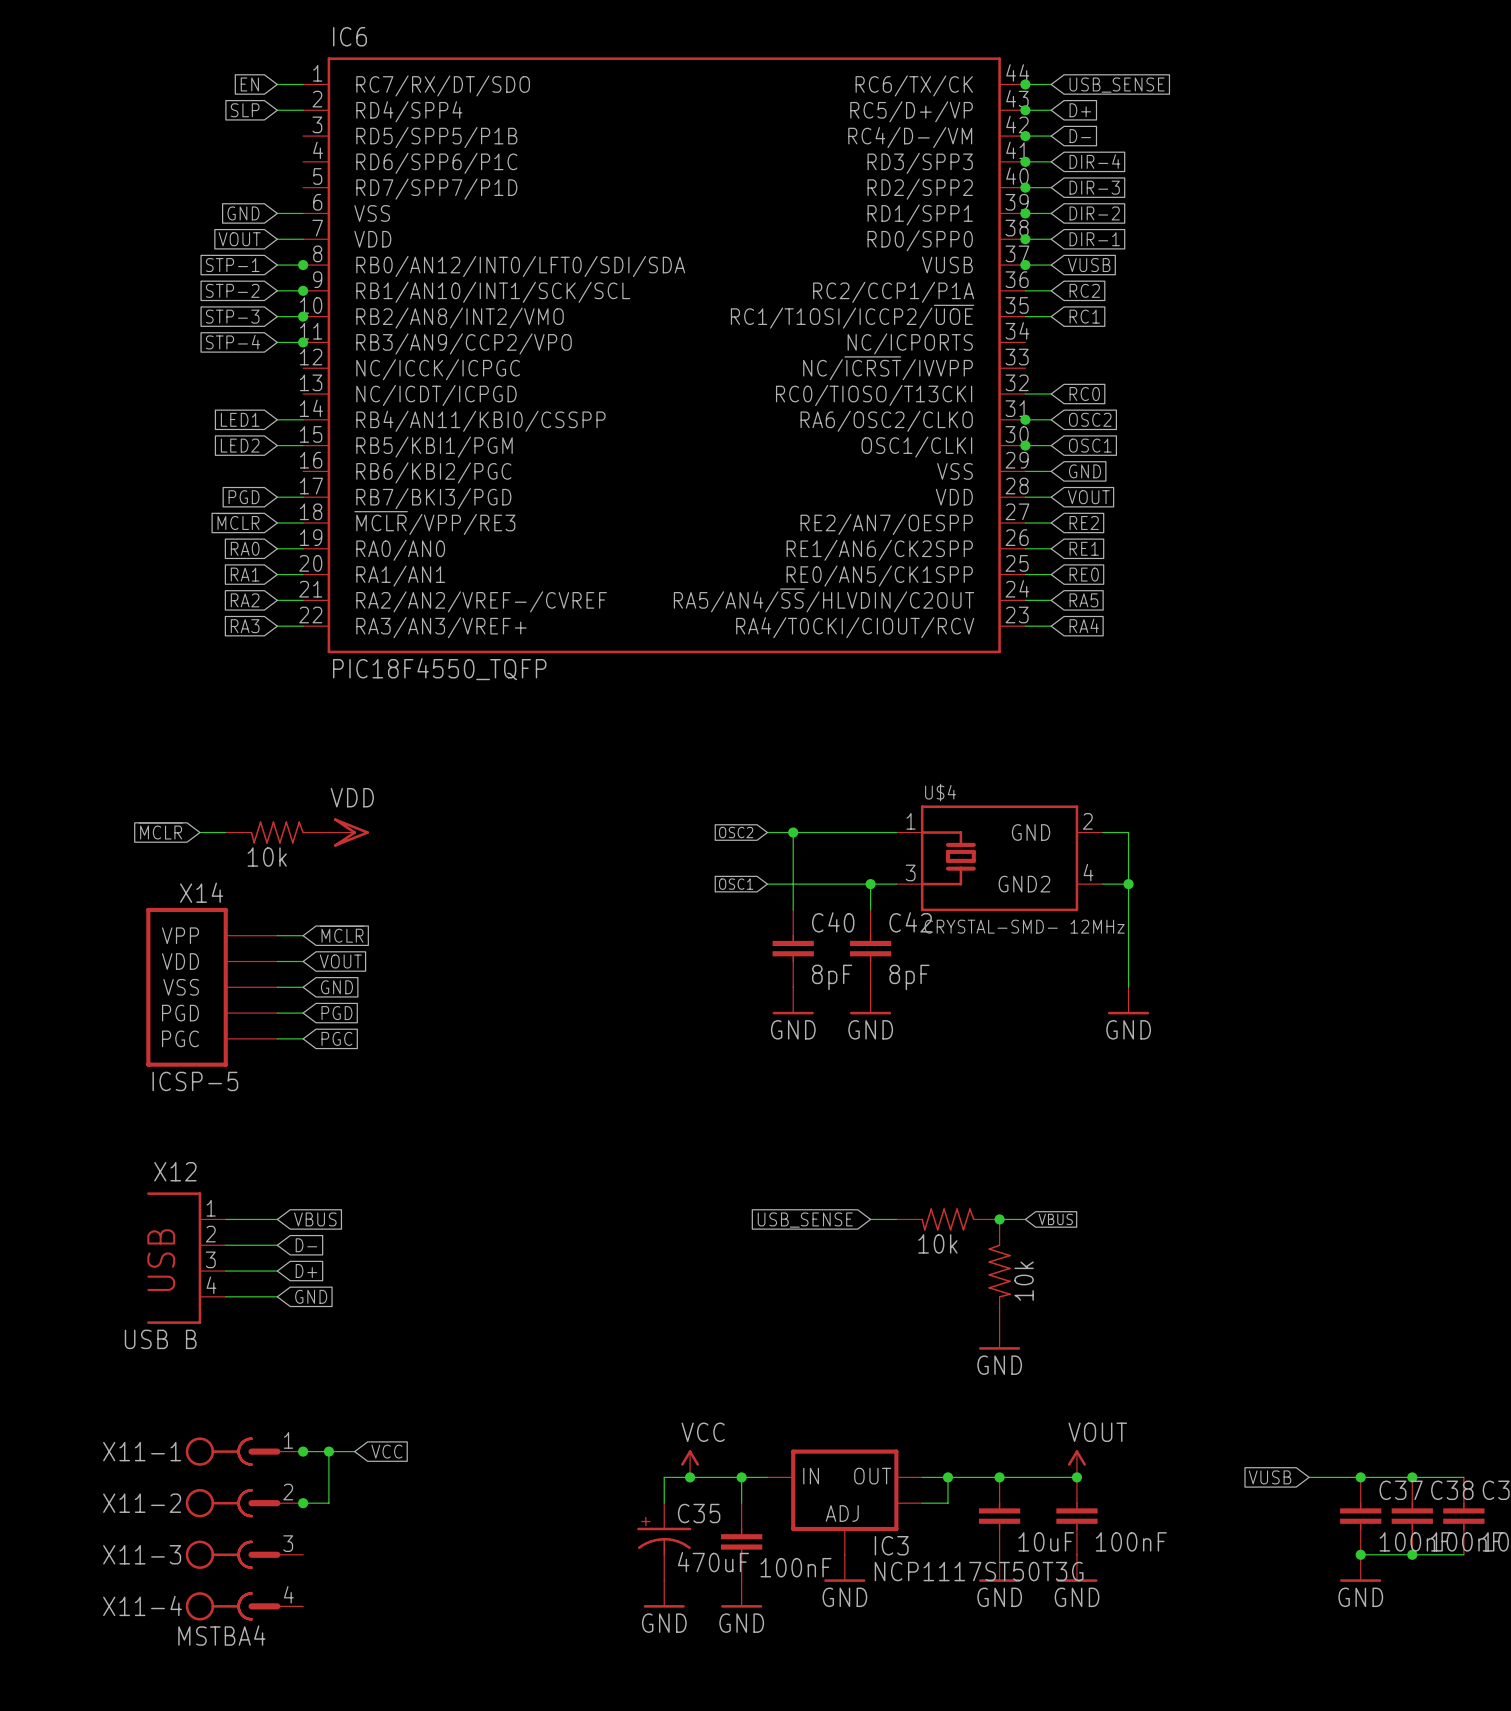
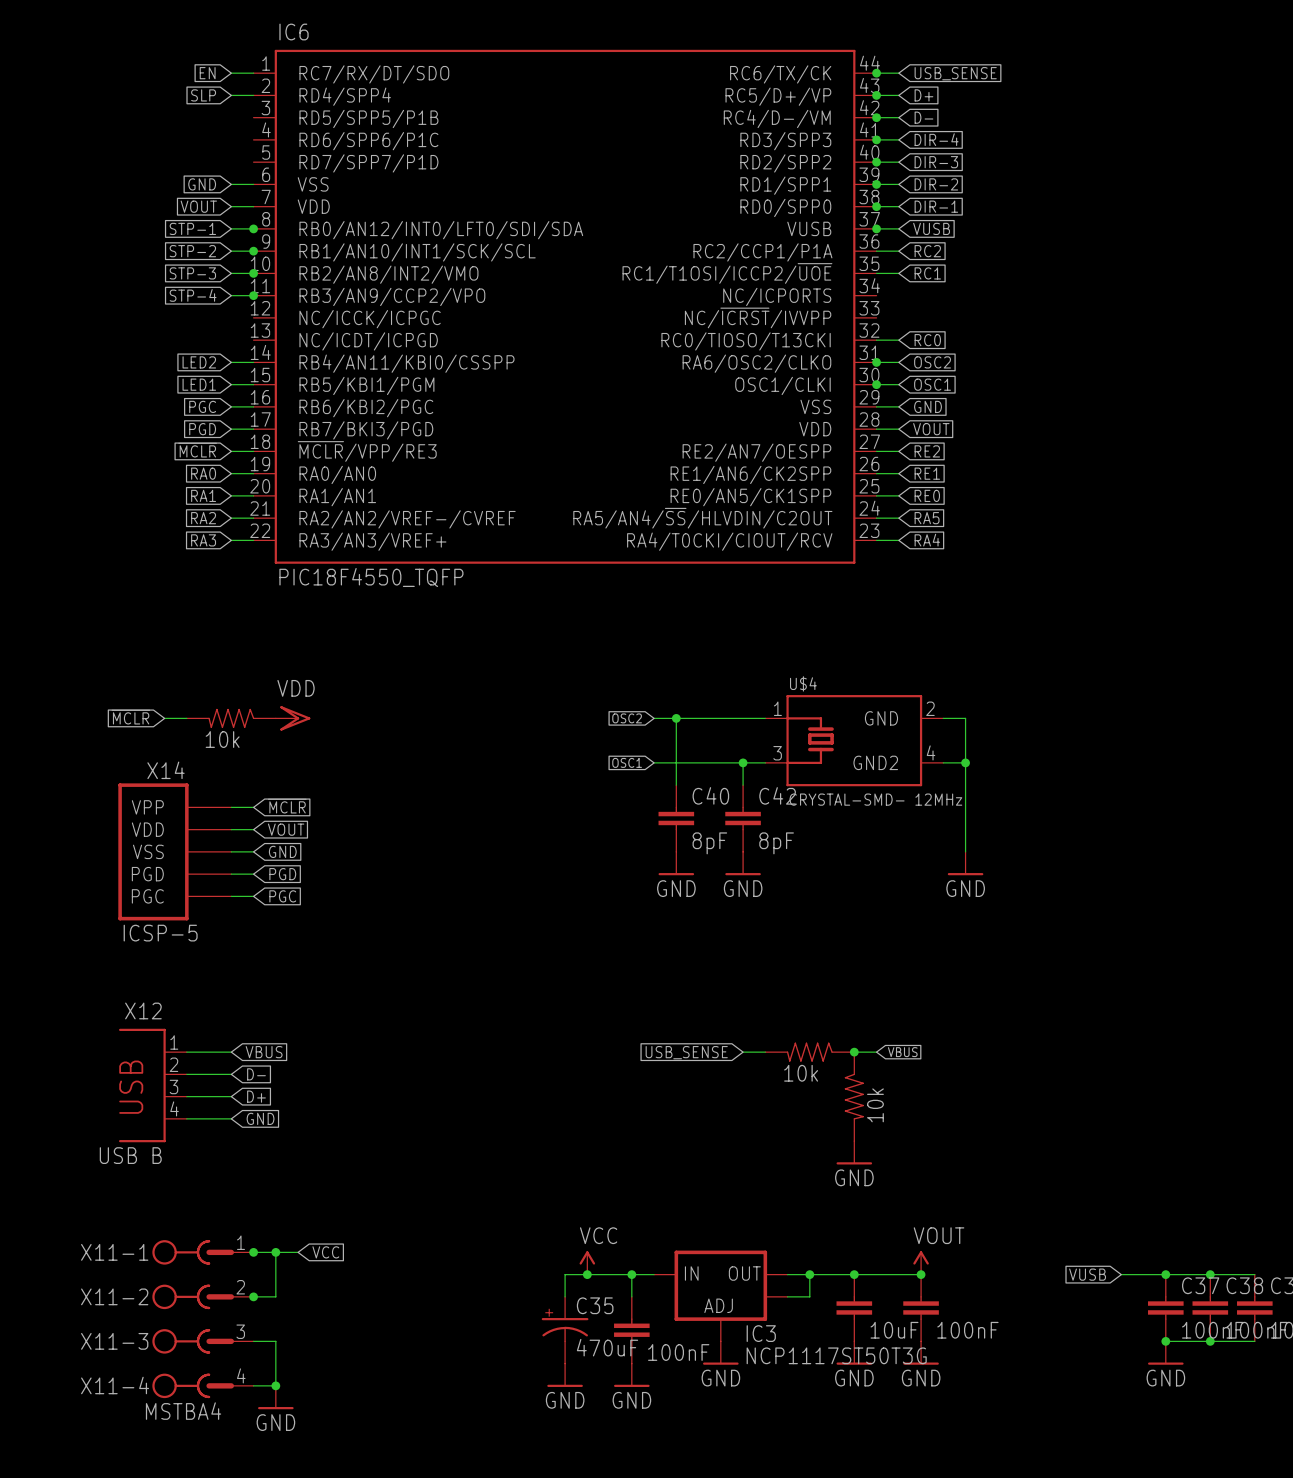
global label: LED1 (240, 419) -> LED2 (199, 362)
global label: LED2 (240, 445) -> LED1 (199, 384)
global label: none -> PGC (202, 406)
wire: none -> (231, 406) (253, 406)
wire: none -> (253, 1341) (275, 1341) (275, 1385) (253, 1385)
junction: none -> (275, 1385)
power symbol: none -> GND (275, 1397)

